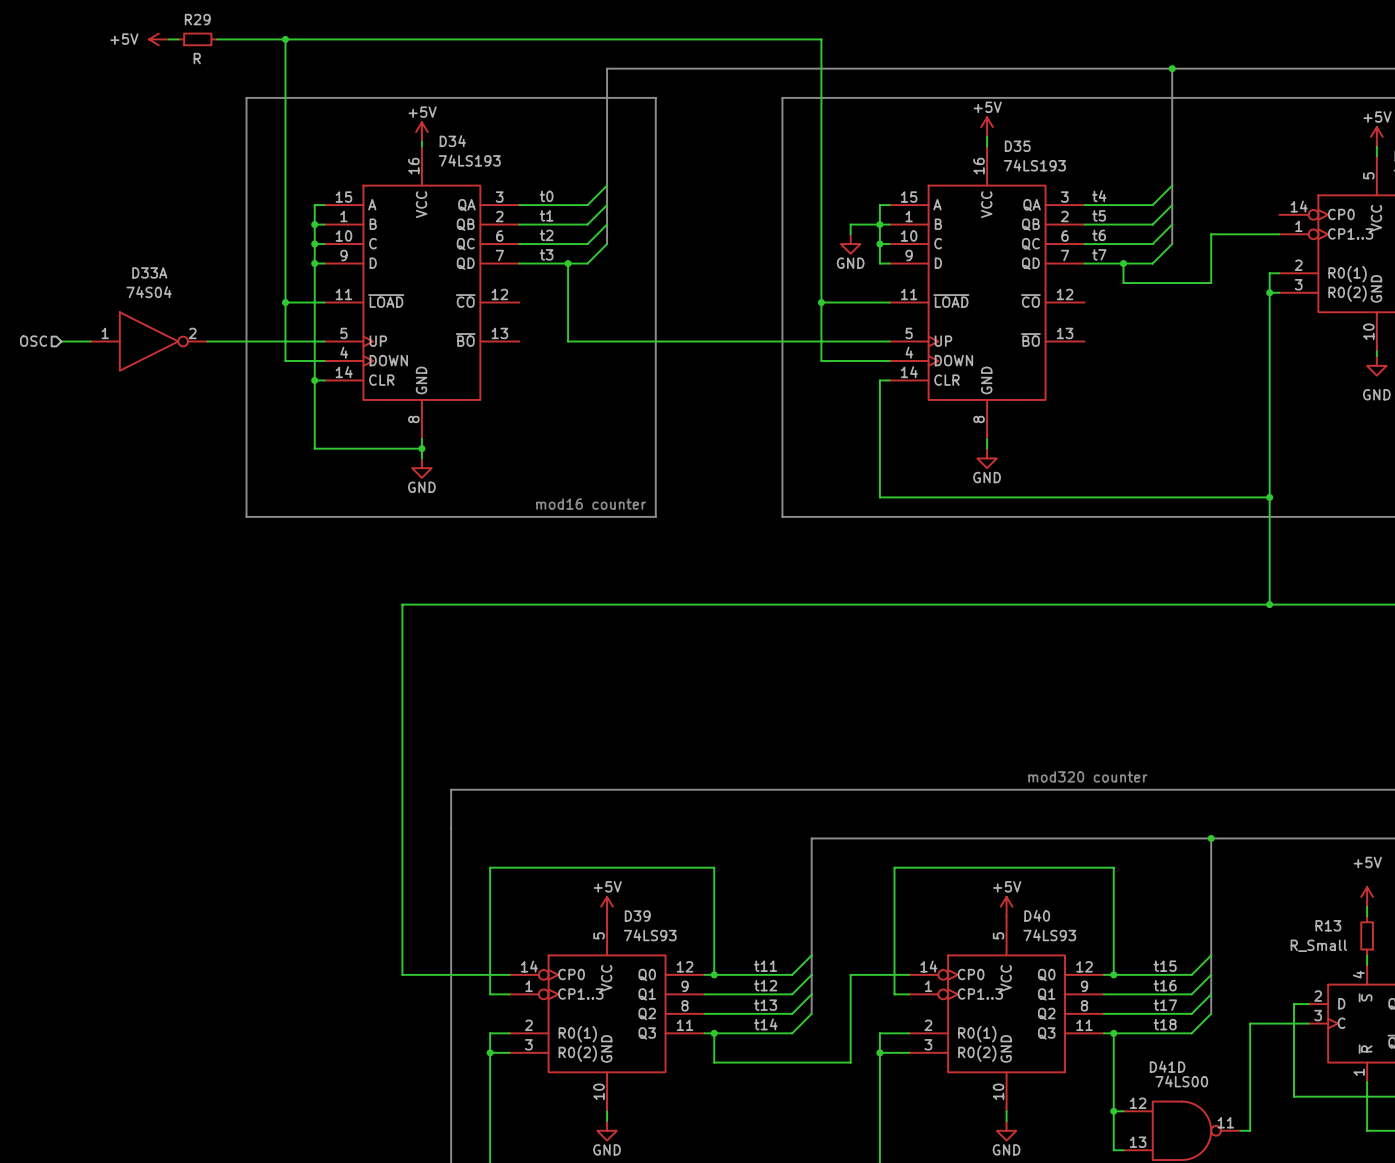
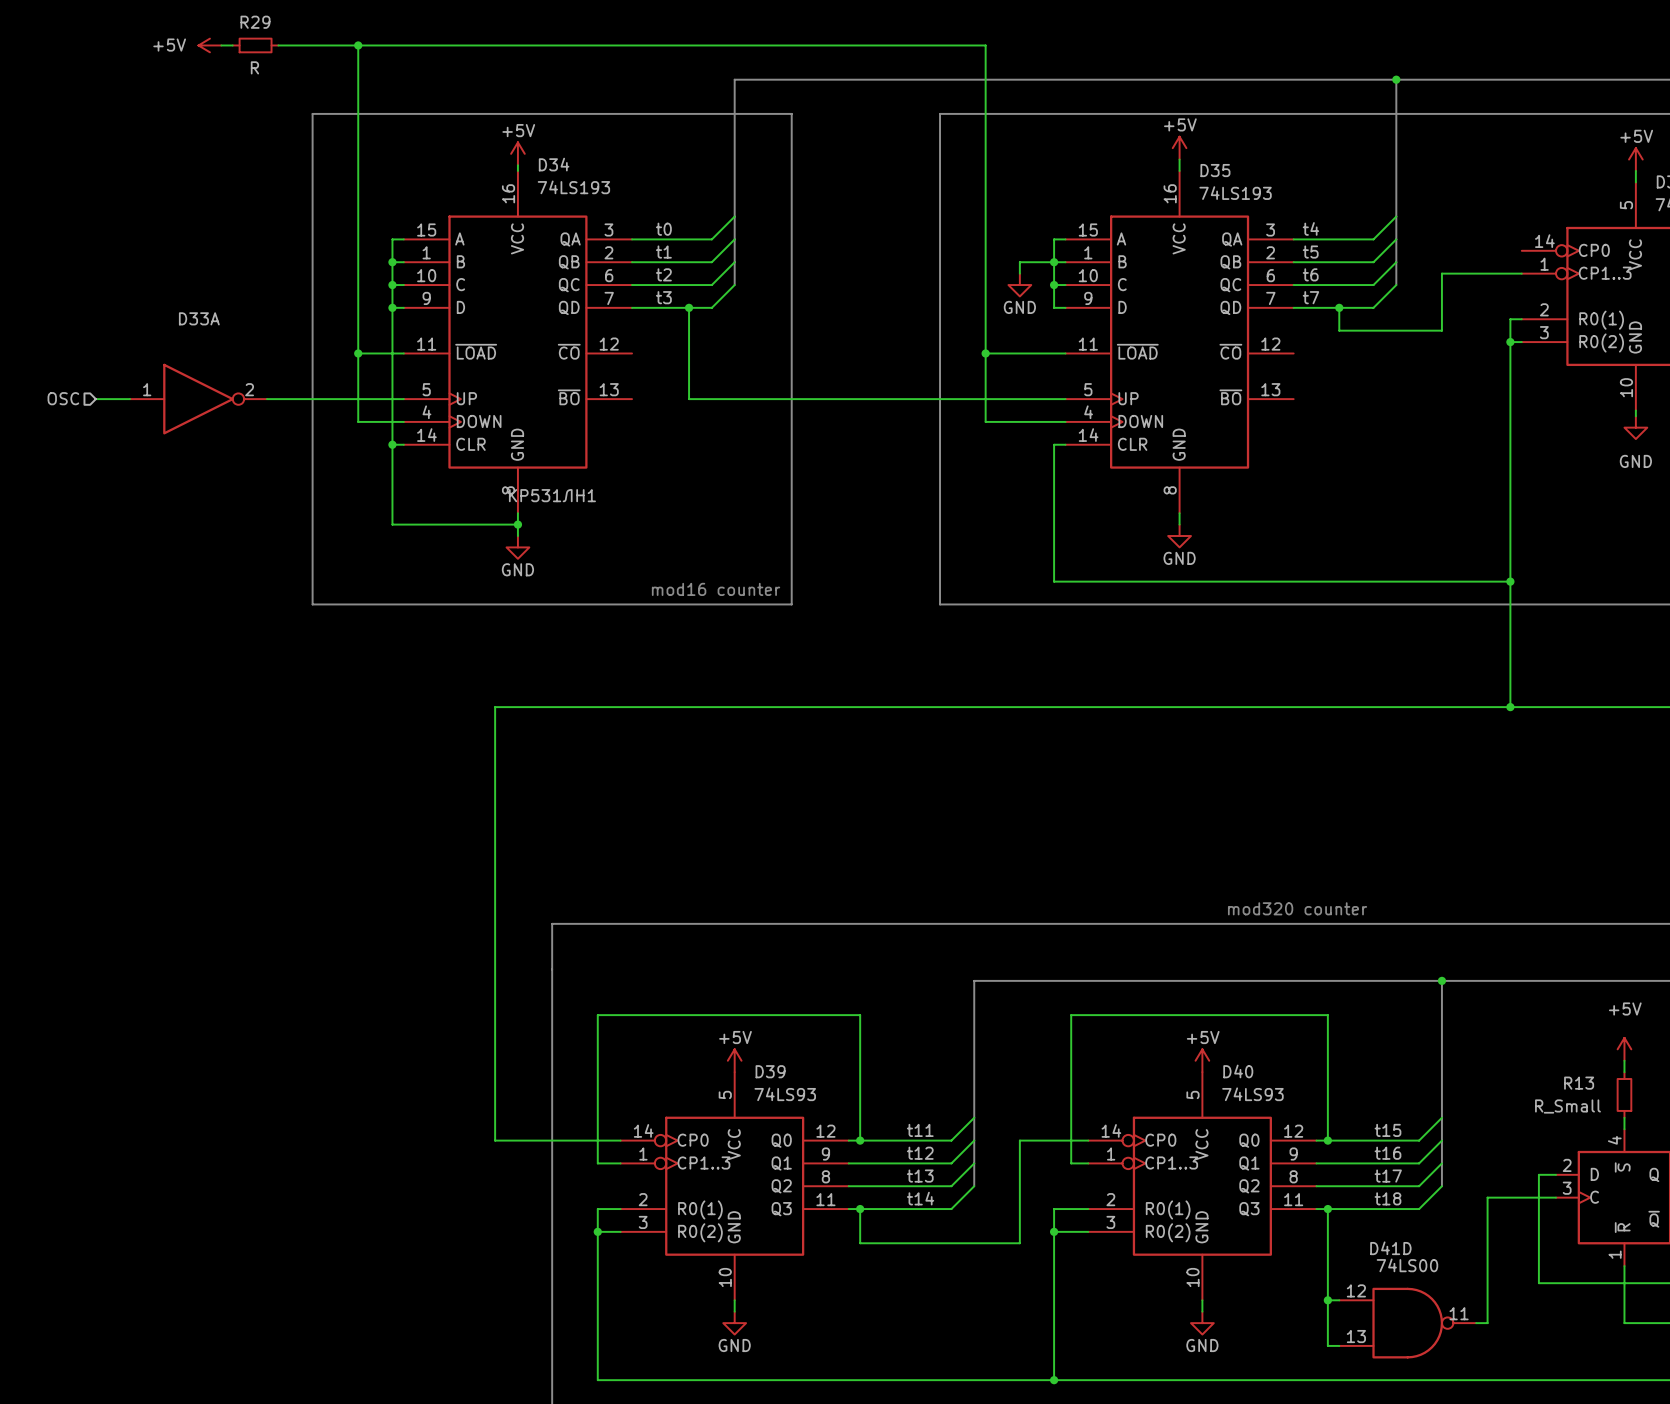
D33A value: 74S04 (149, 292) -> none
D33A text: none -> КР531ЛН1 (552, 495)

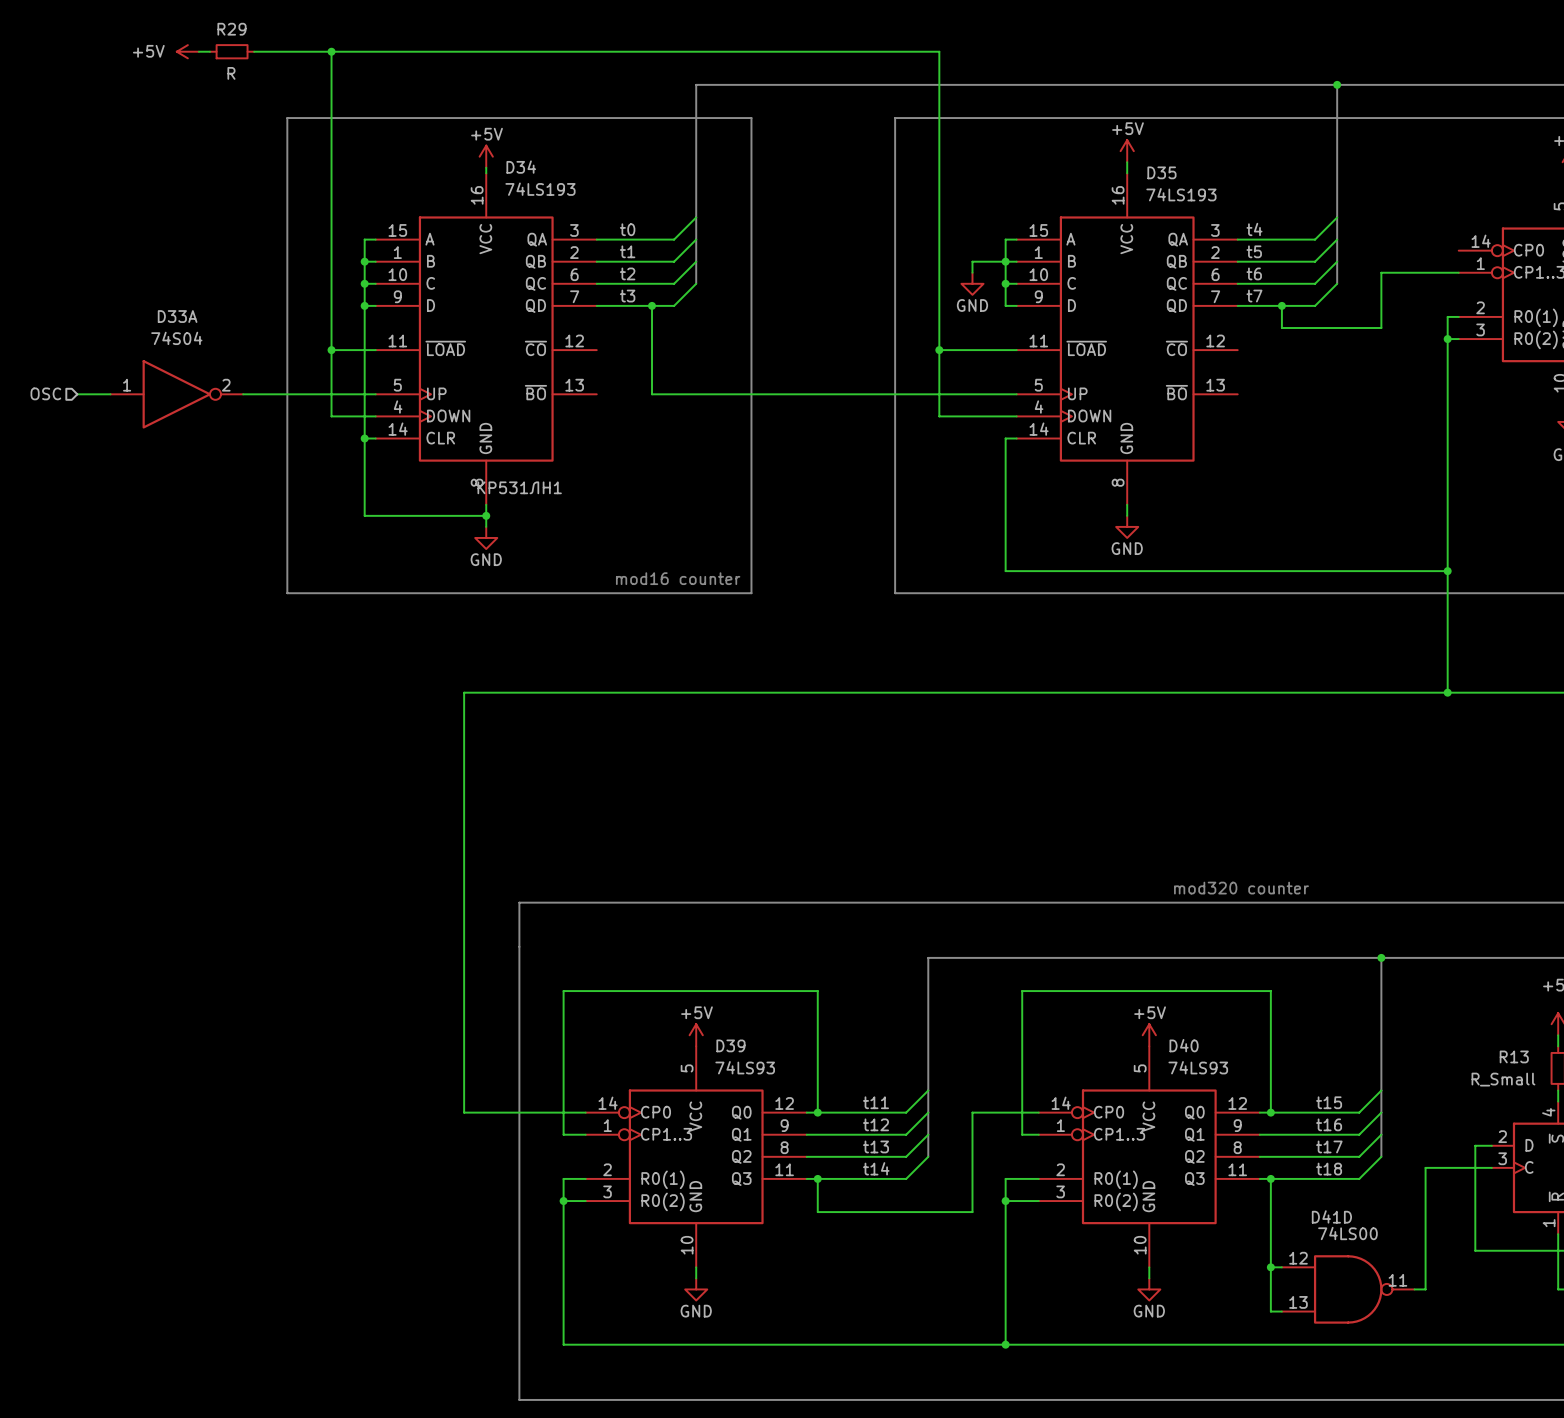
D33A value: none -> 74S04 (176, 338)

